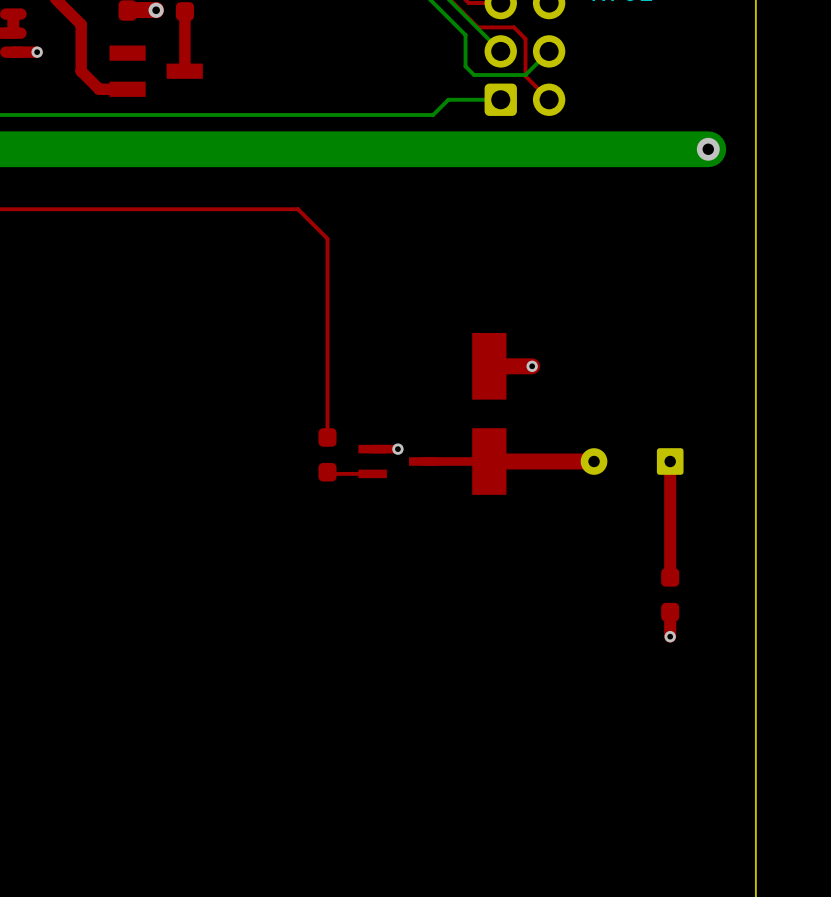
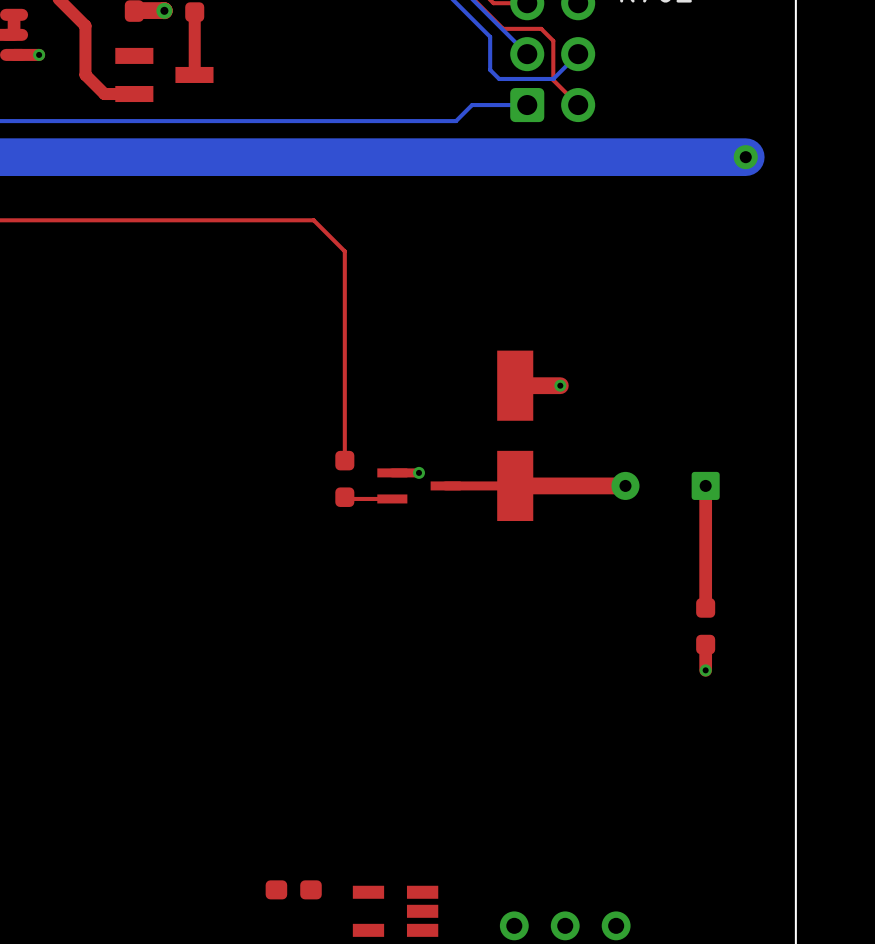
part: none -> (293, 889)
part: none -> (395, 911)
part: none -> (565, 925)

